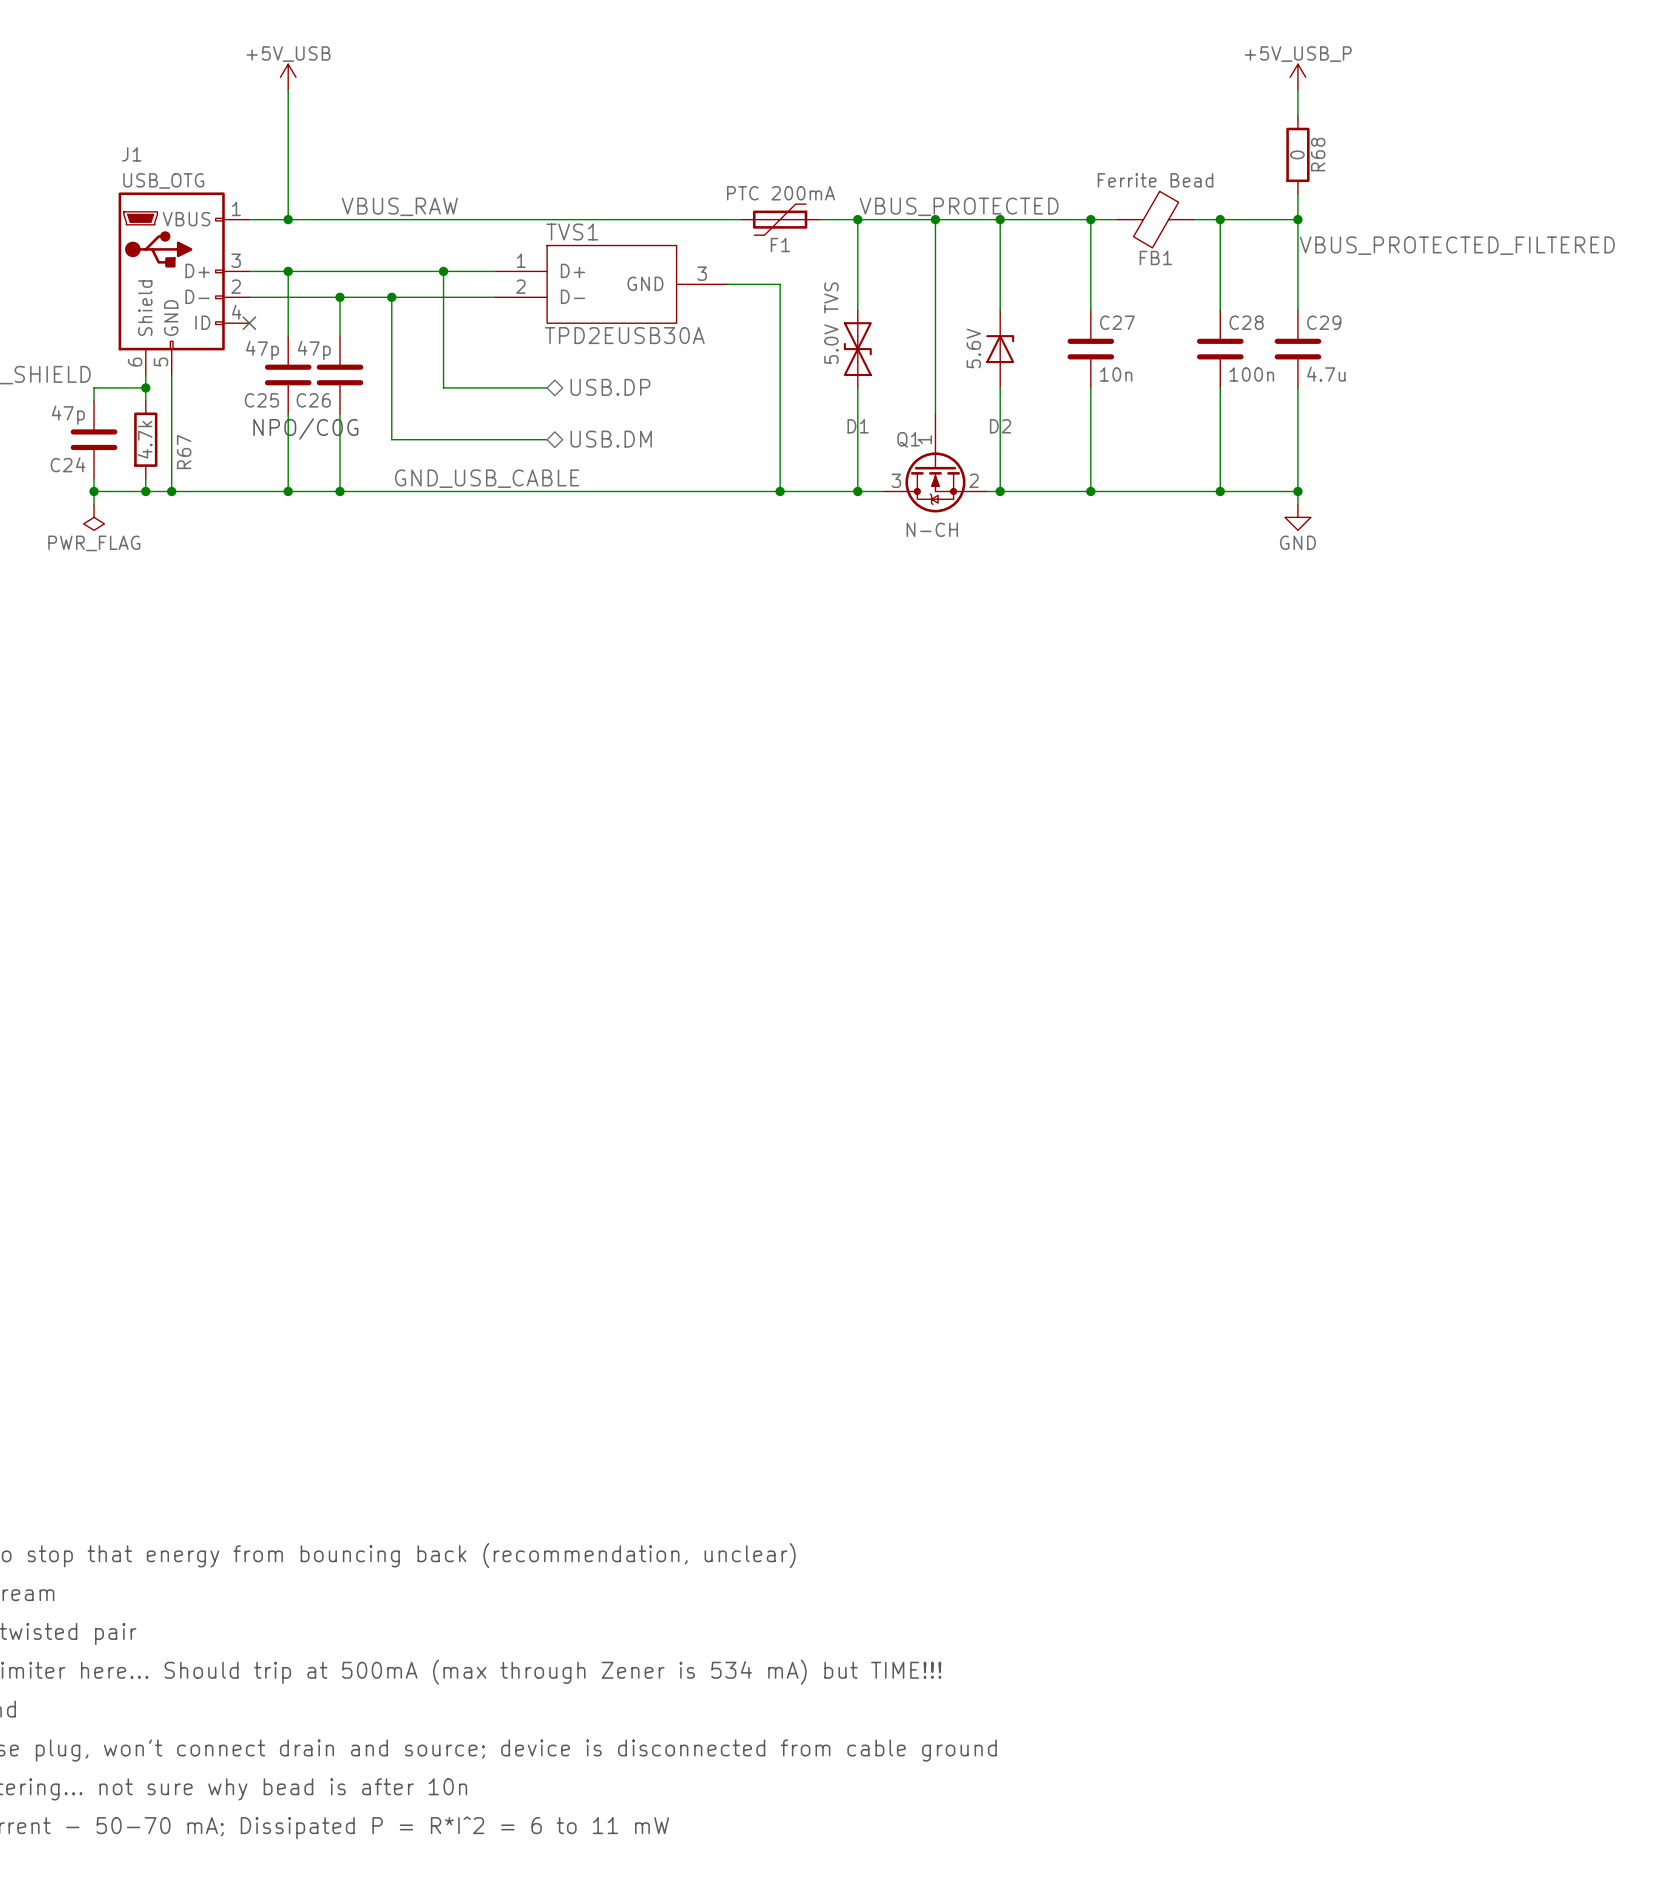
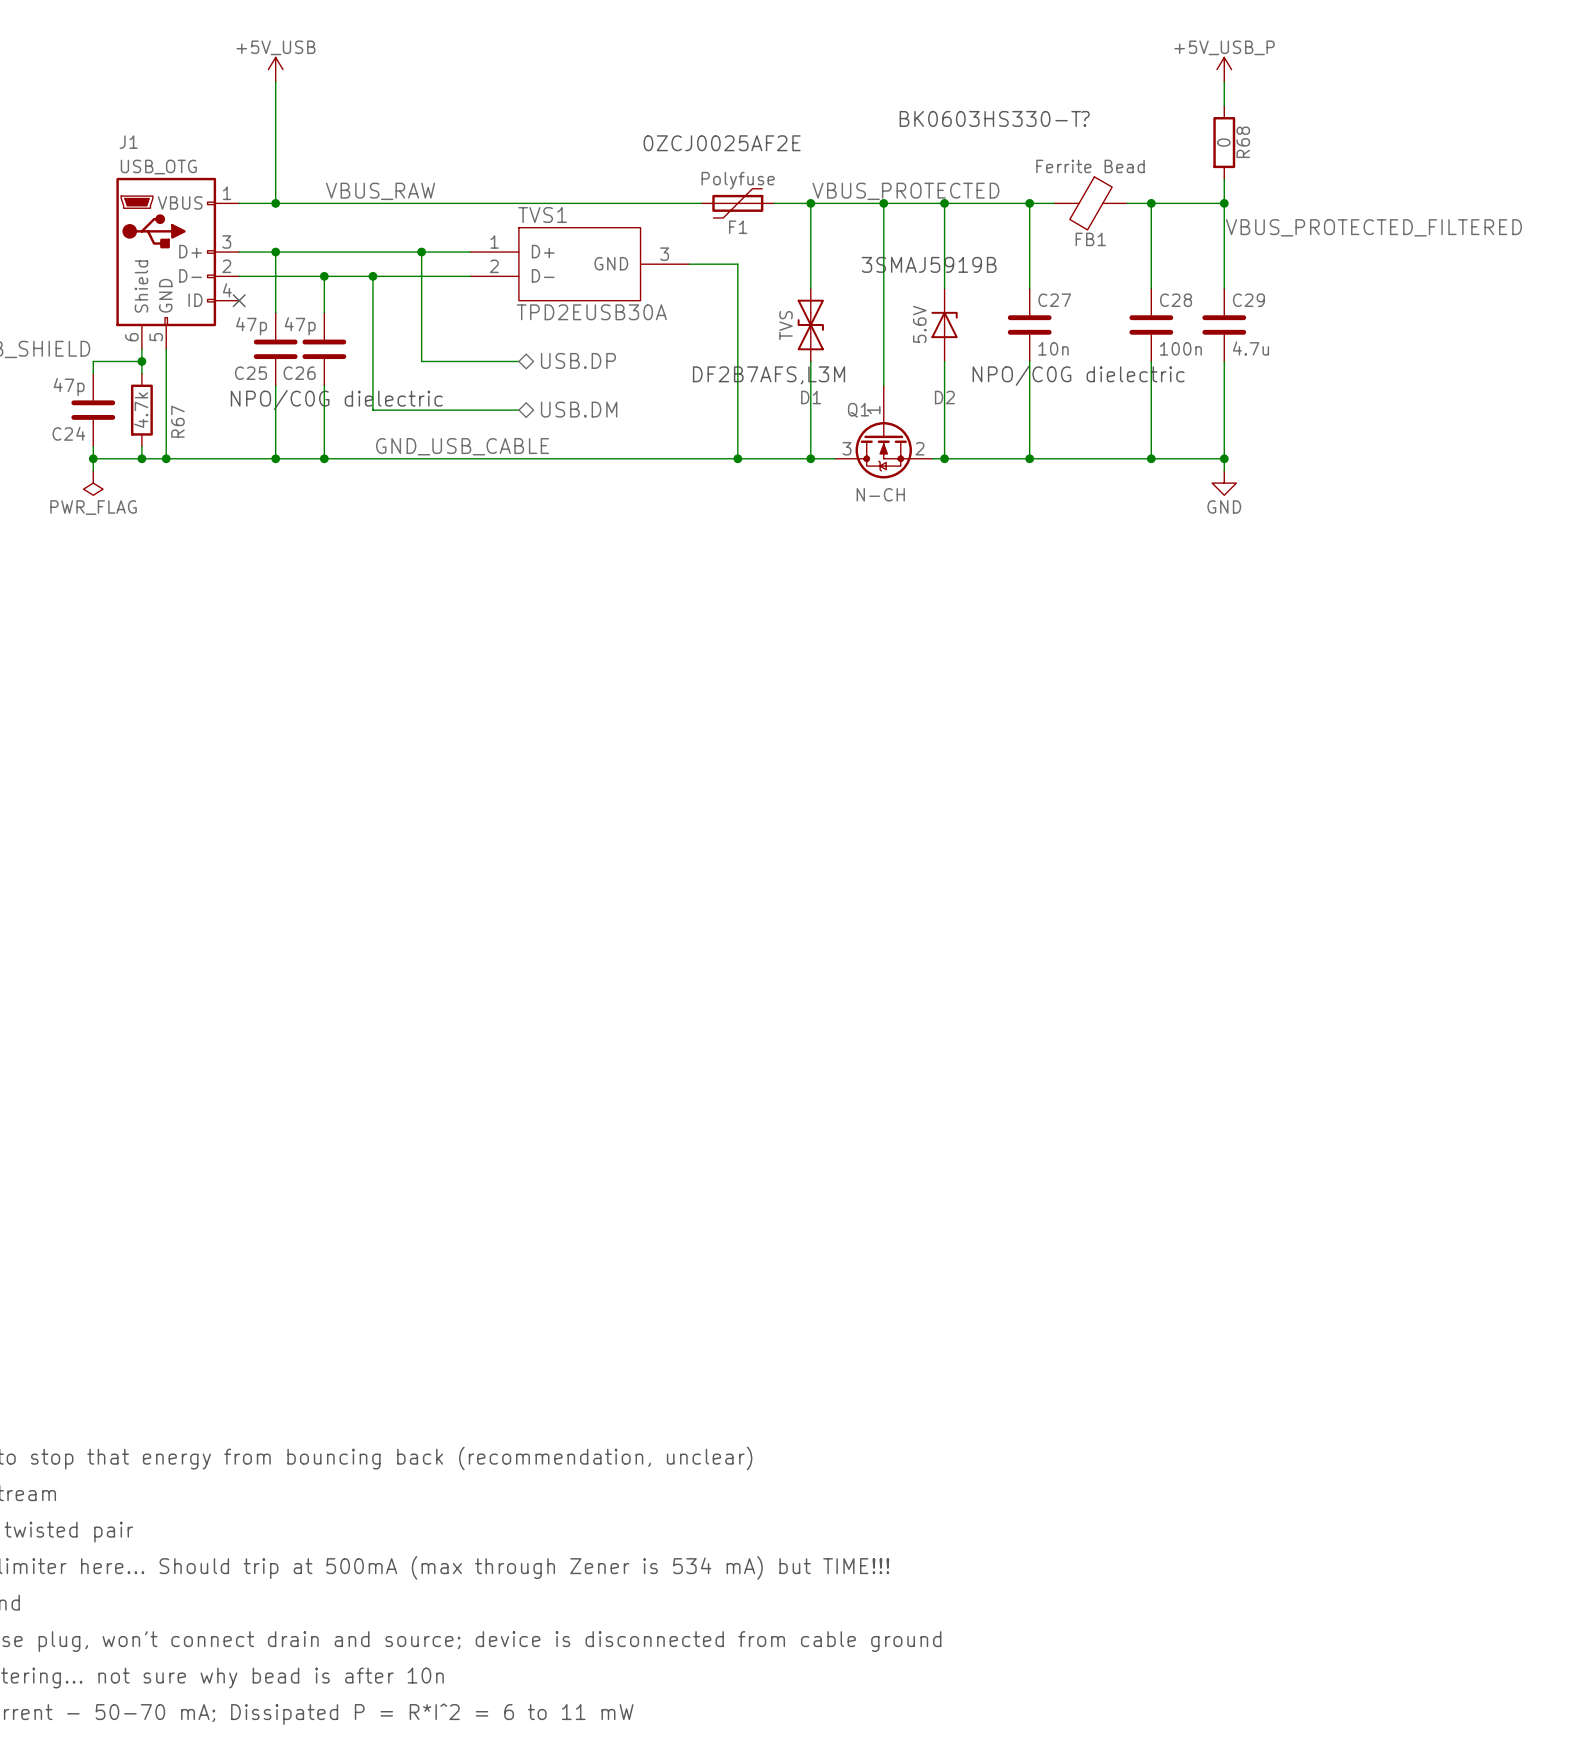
text: none -> BK0603HS330-T (990, 118)
text: none -> ? (1085, 118)
text: none -> 0ZCJ0025AF2E (722, 143)
F1 value: PTC 200mA (781, 193) -> Polyfuse (738, 180)
text: none -> 3SMAJ5919B (929, 264)
D1 value: 5.0V TVS (831, 323) -> TVS (786, 325)
text: none -> DF2B7AFS,L3M (769, 375)
text: none -> NPO/C0G dielectric (1078, 375)
text: NPO/C0G (305, 428) -> none
text: none -> NPO/C0G dielectric (336, 400)

